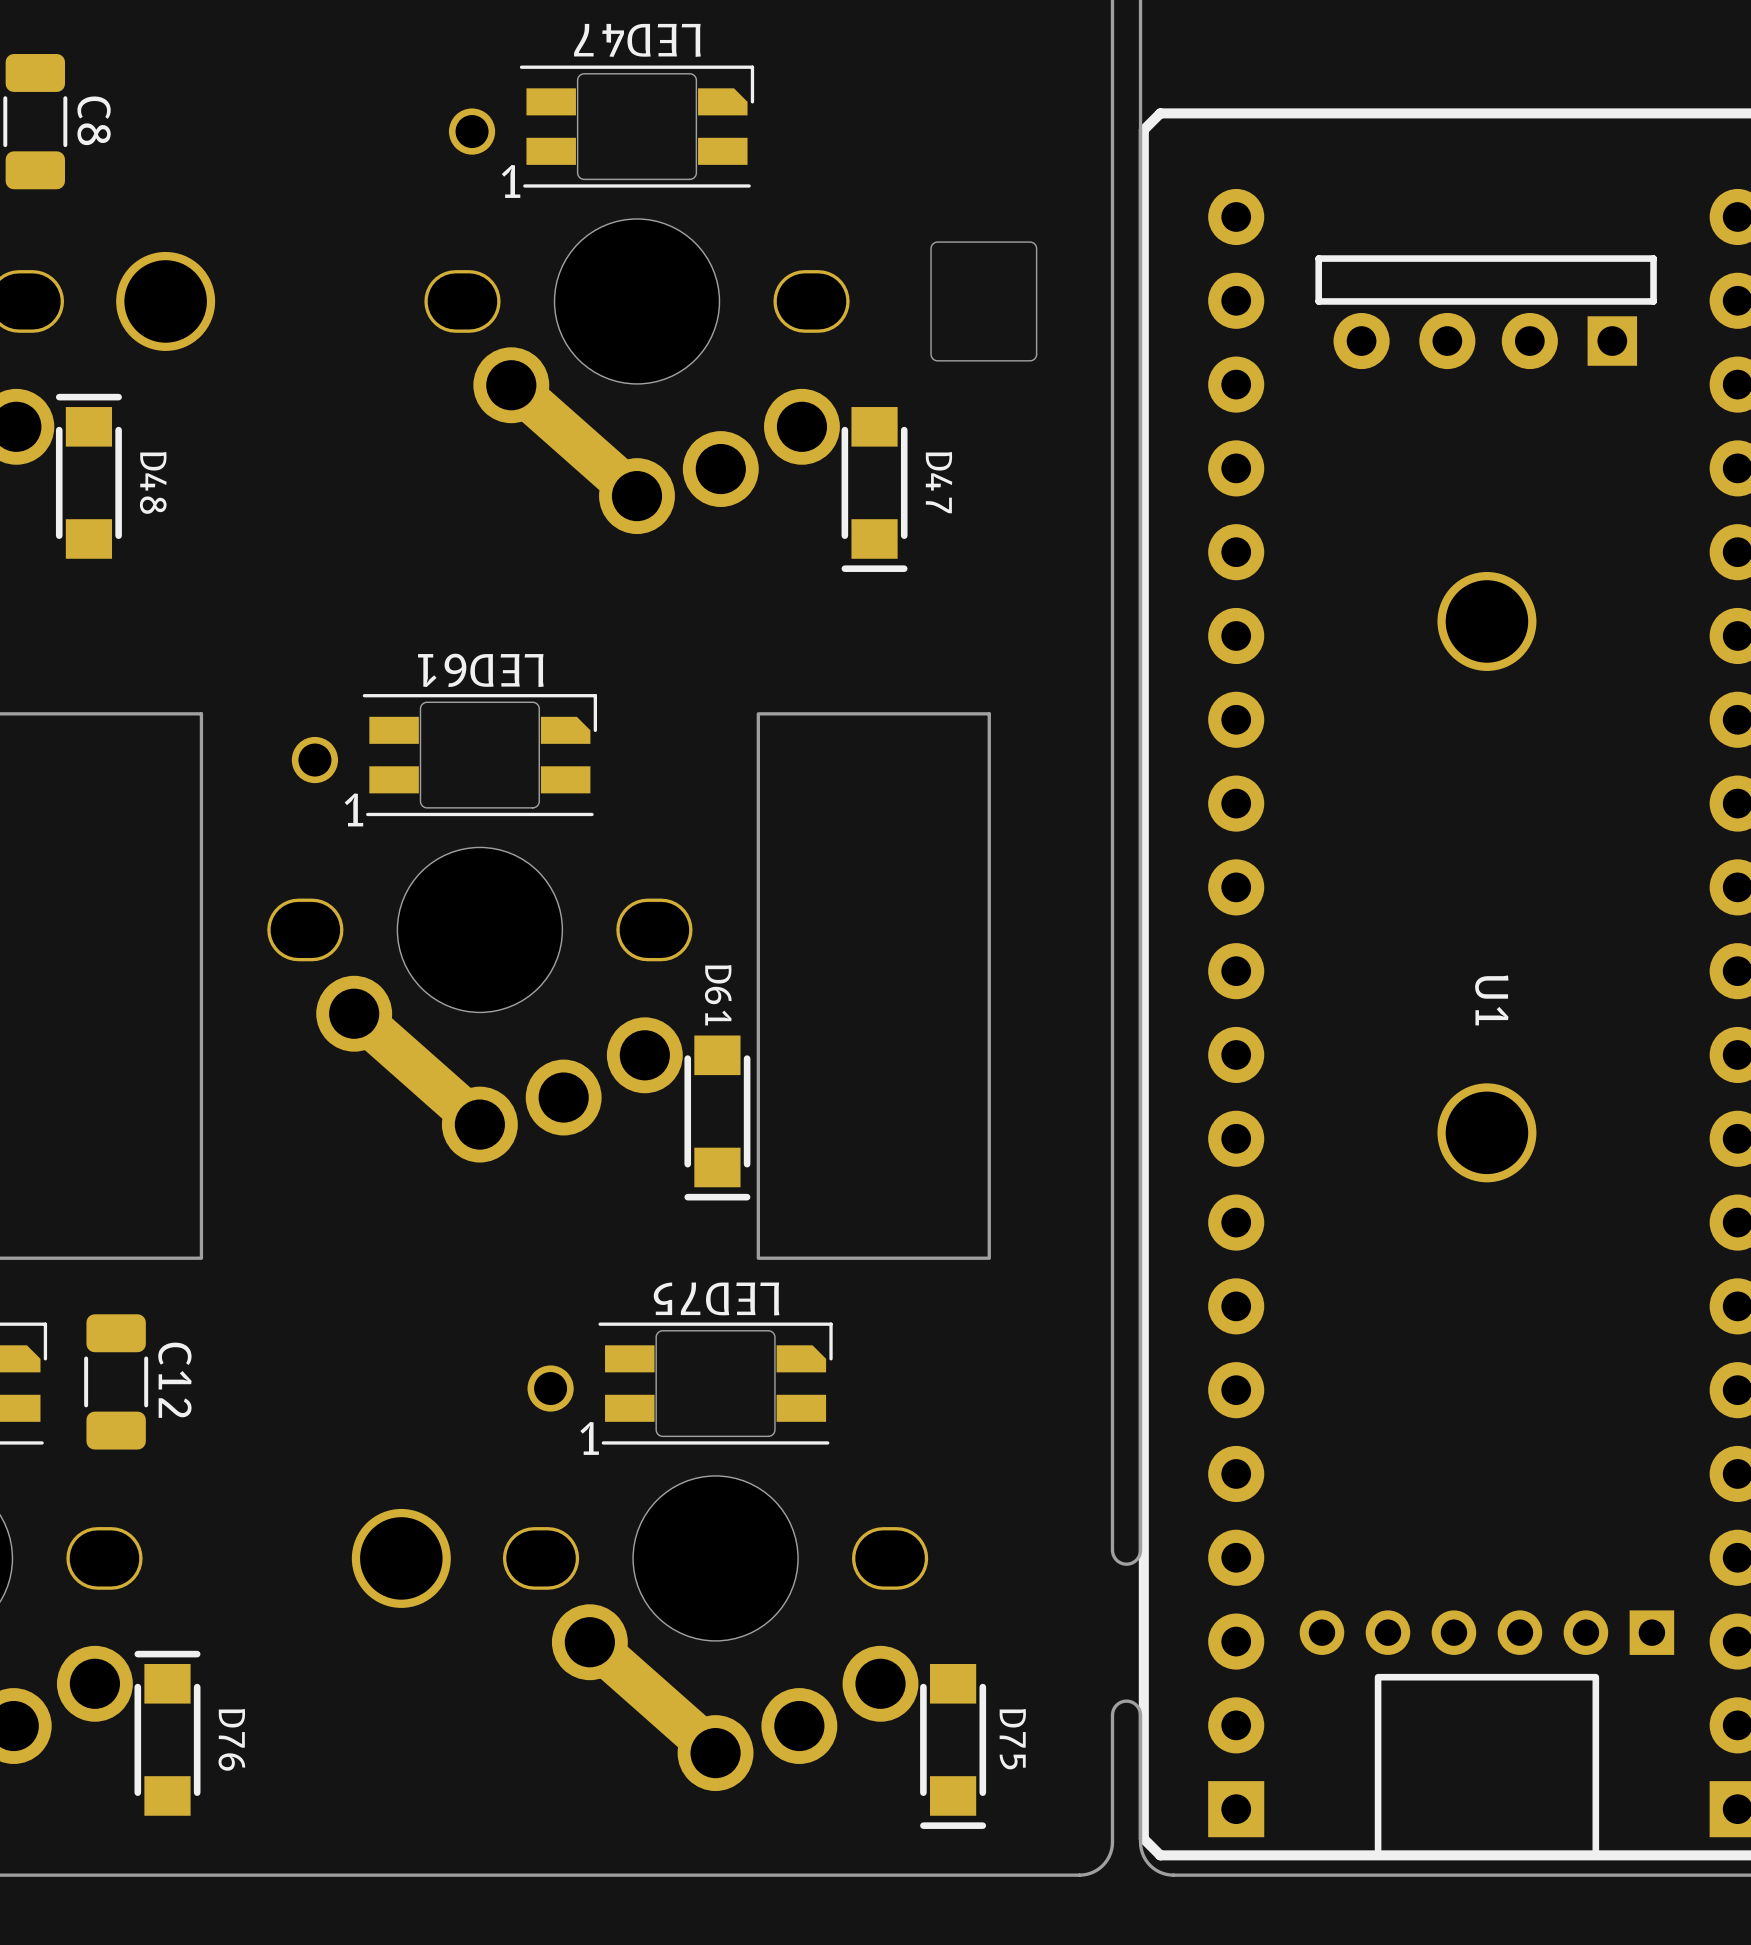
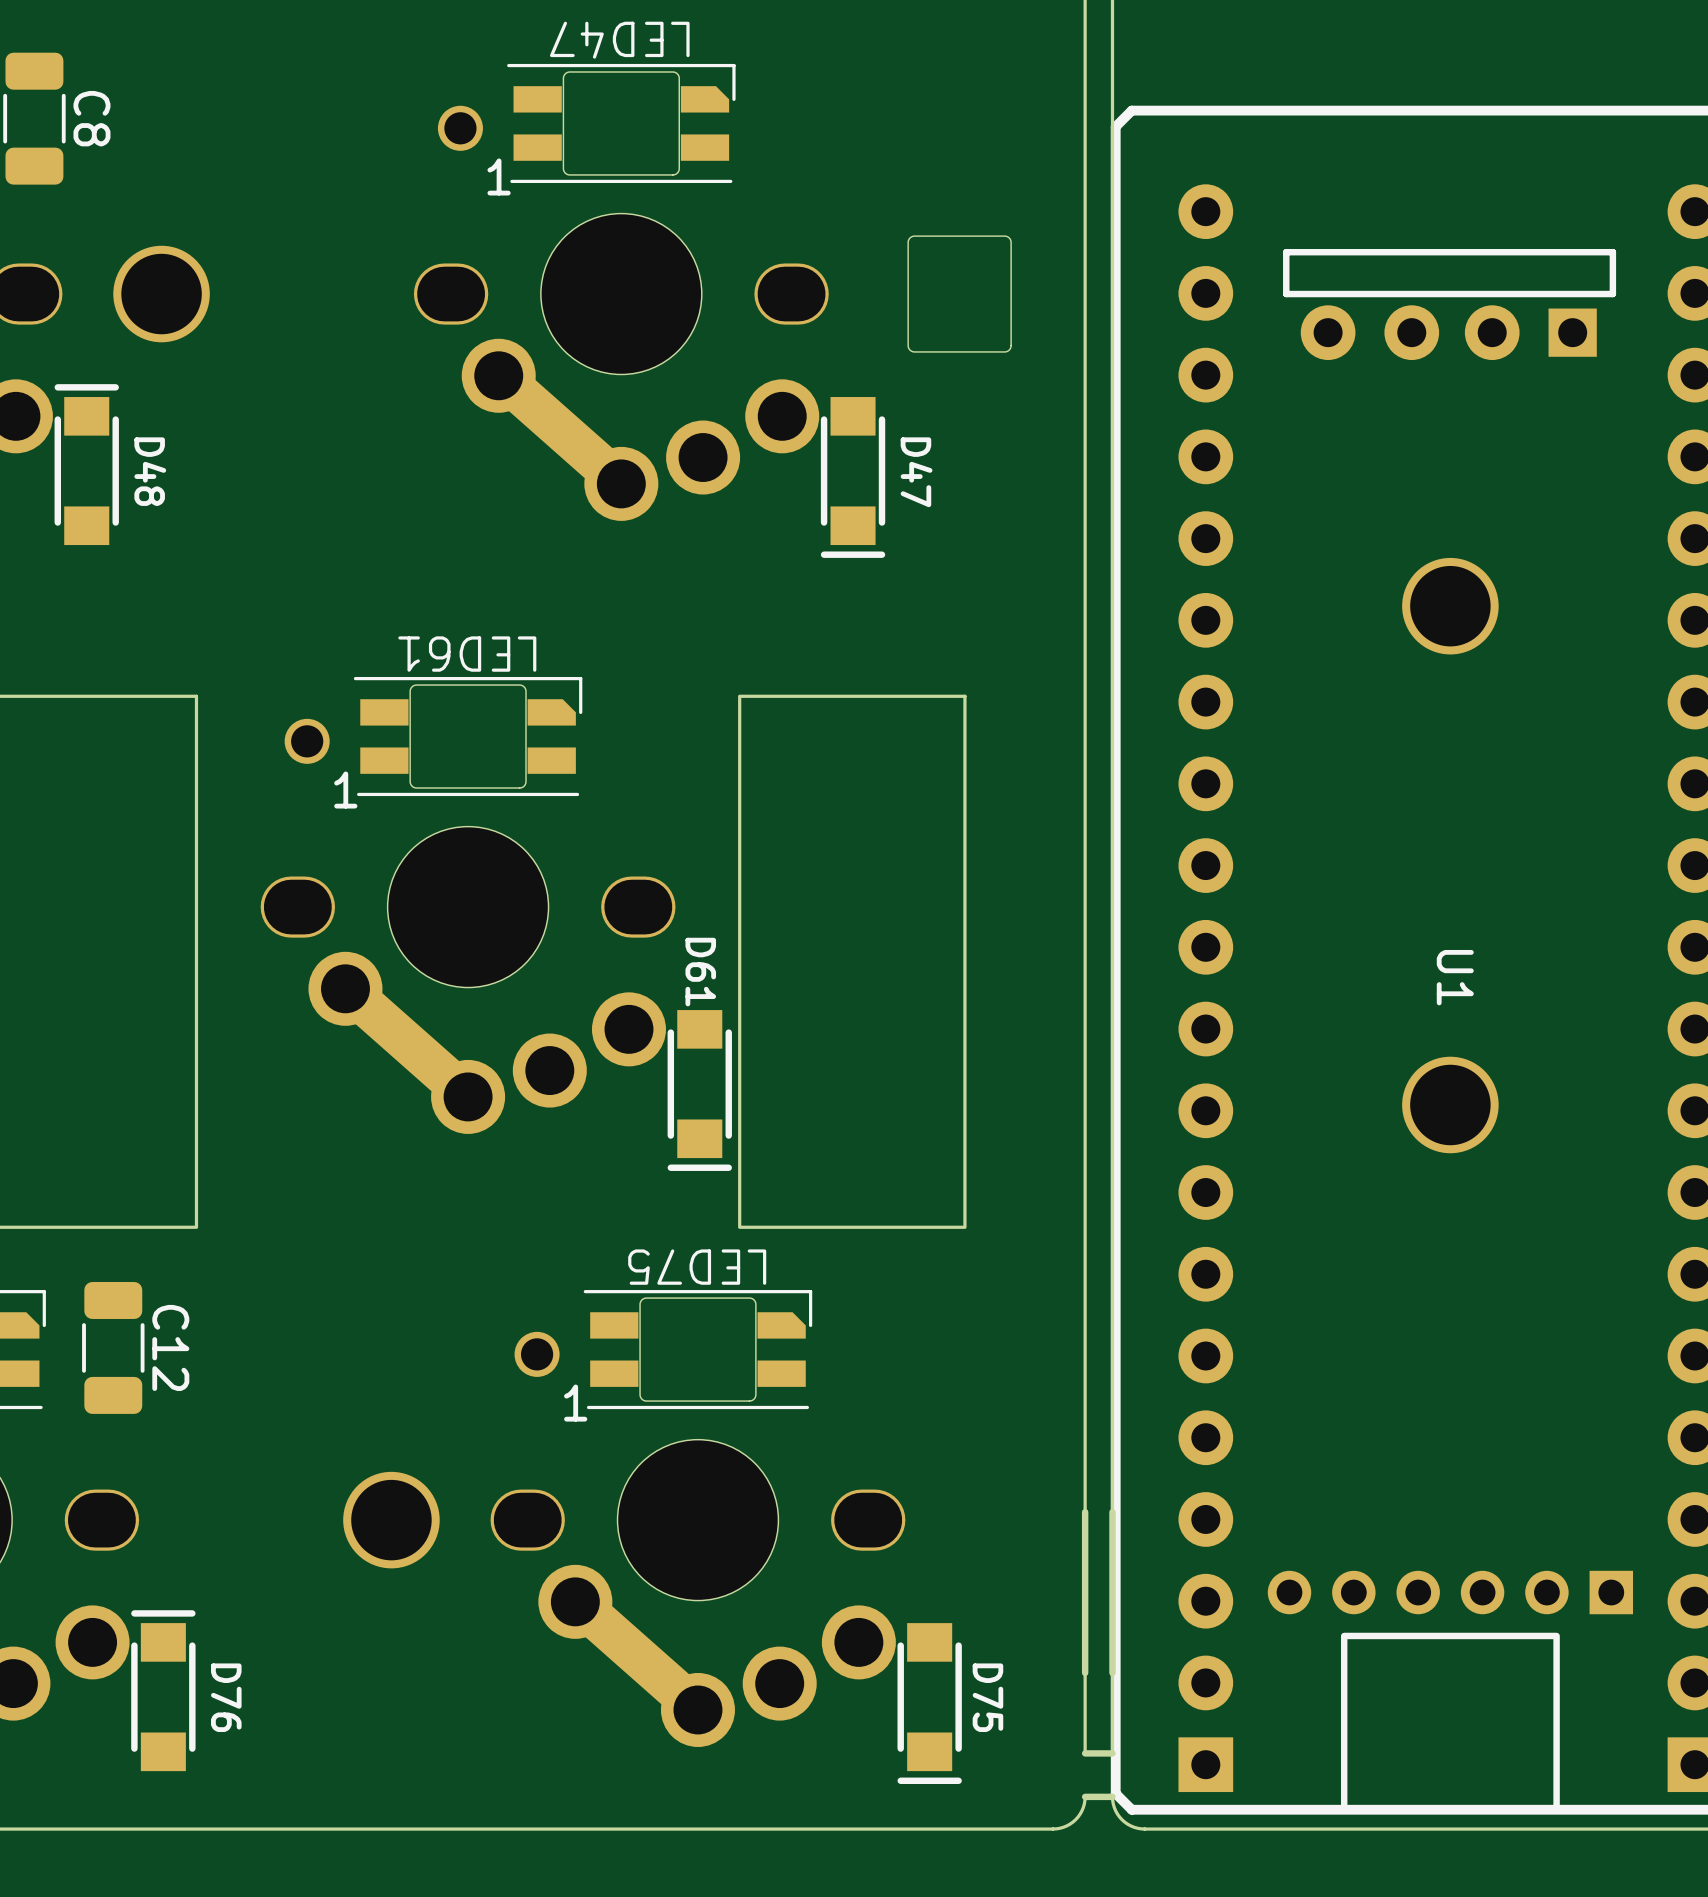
board edge: (1140, 1550) (1135, 1560) (1126, 1564) (1117, 1560) (1112, 1550) -> (1112, 1512) (1112, 1672)
board edge: (1140, 1715) (1136, 1705) (1126, 1701) (1116, 1705) (1112, 1715) -> (1085, 1512) (1085, 1672)
board edge: (1112, 1797) (1112, 1842) -> (1112, 1796) (1085, 1796)
board edge: (1140, 1797) (1140, 1842) -> (1112, 1753) (1085, 1753)

